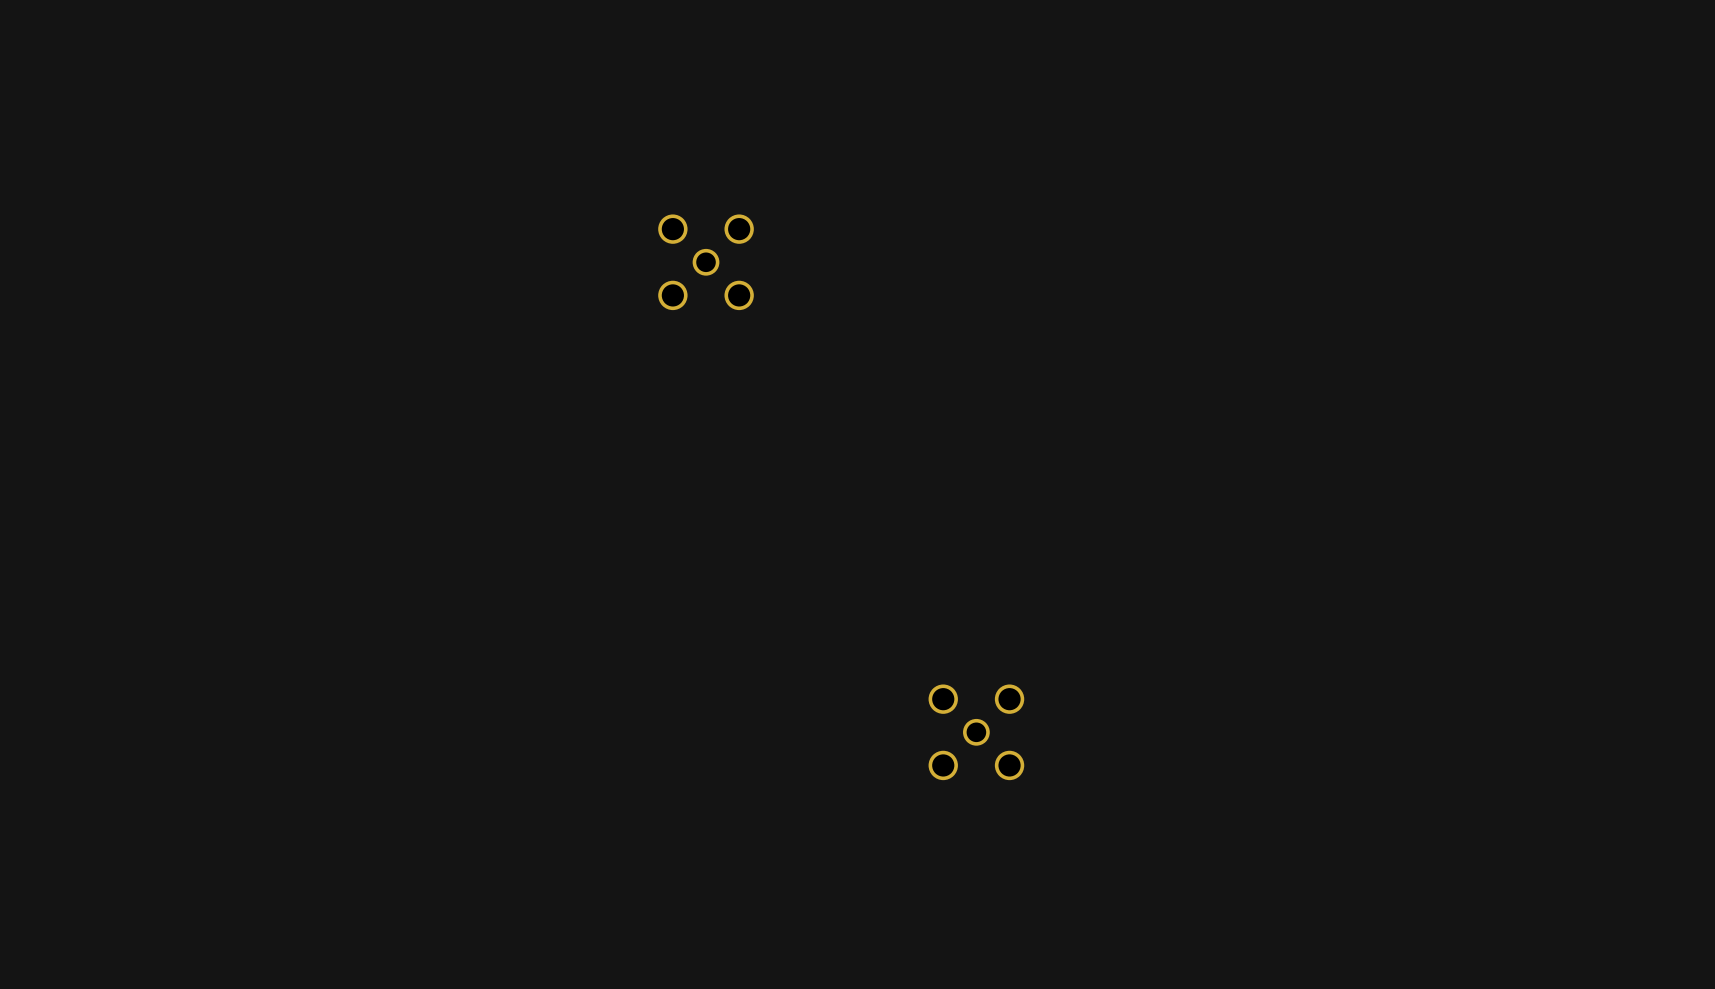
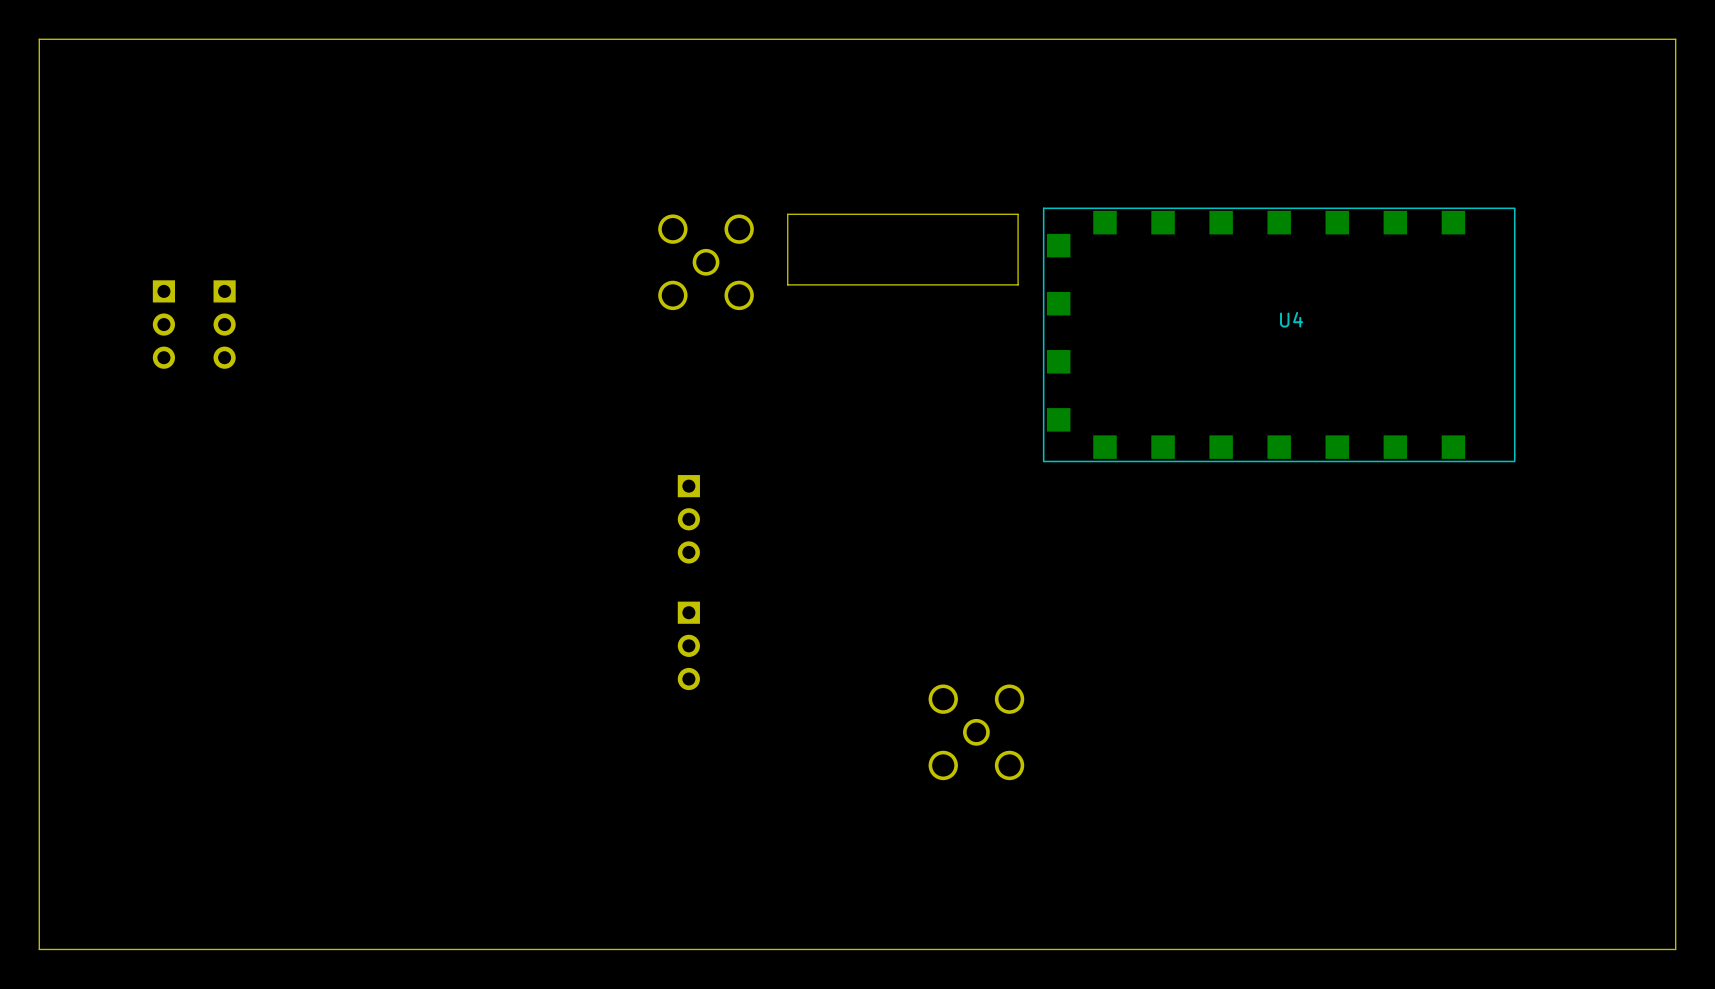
board edge: none -> (1675, 39) (39, 39) (39, 949) (1675, 949) (1675, 39)
board edge: none -> (1018, 214) (787, 214) (787, 284) (1018, 284) (1018, 214)
part: none -> (163, 324)
part: none -> (224, 324)
U4: none -> (1279, 334)
part: none -> (688, 519)
part: none -> (688, 645)

